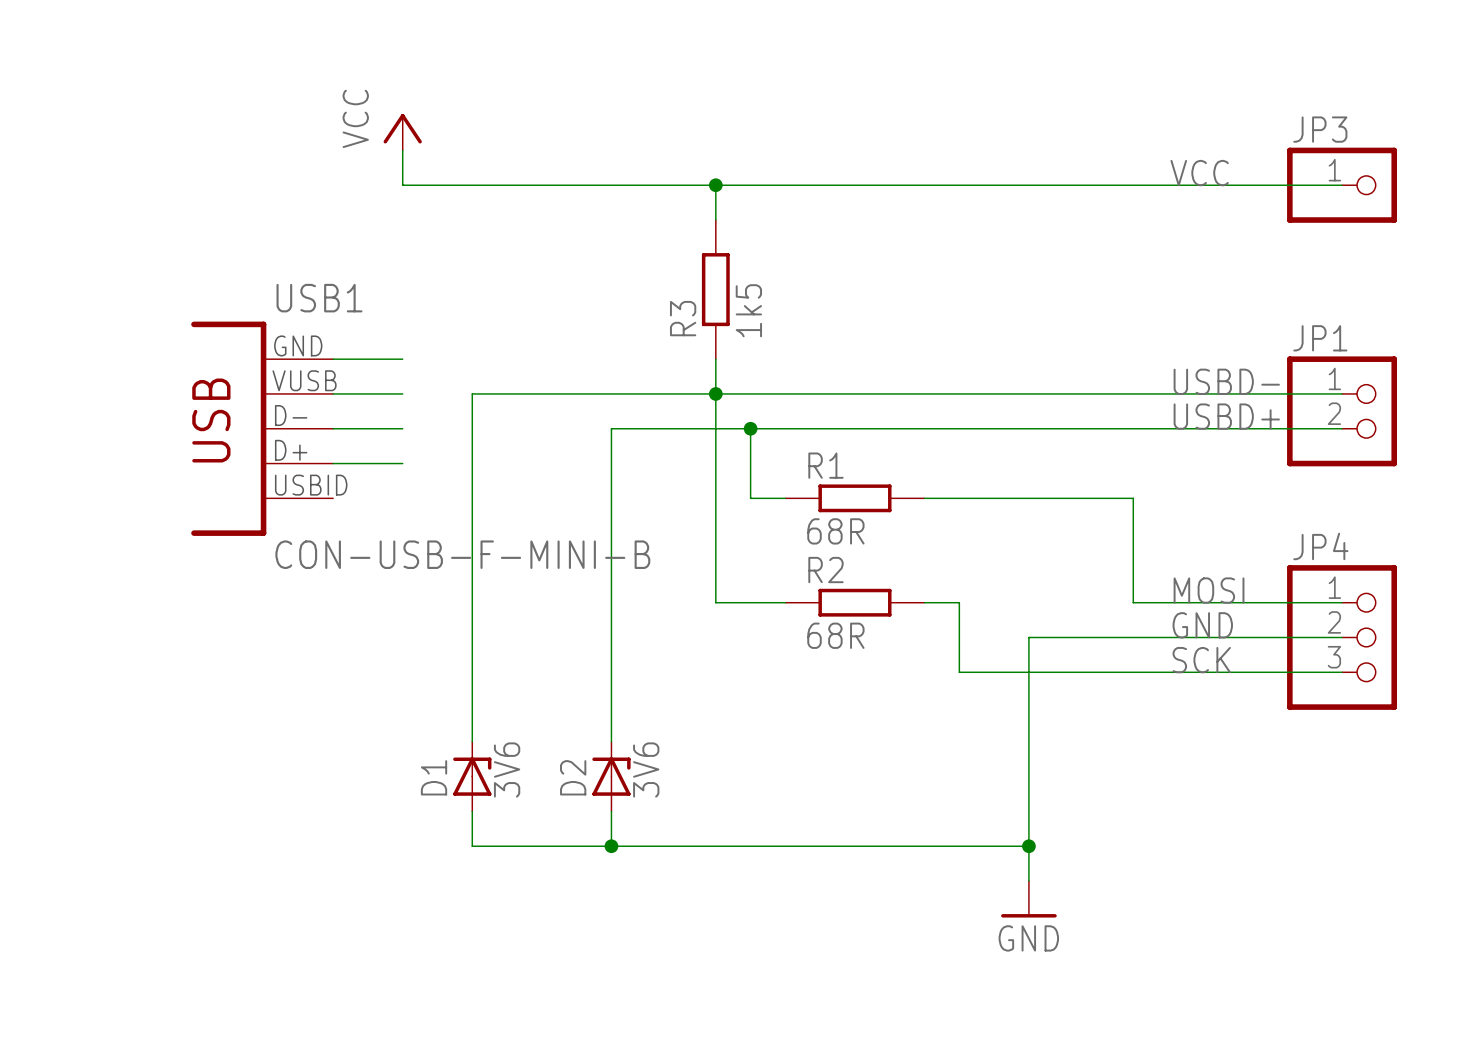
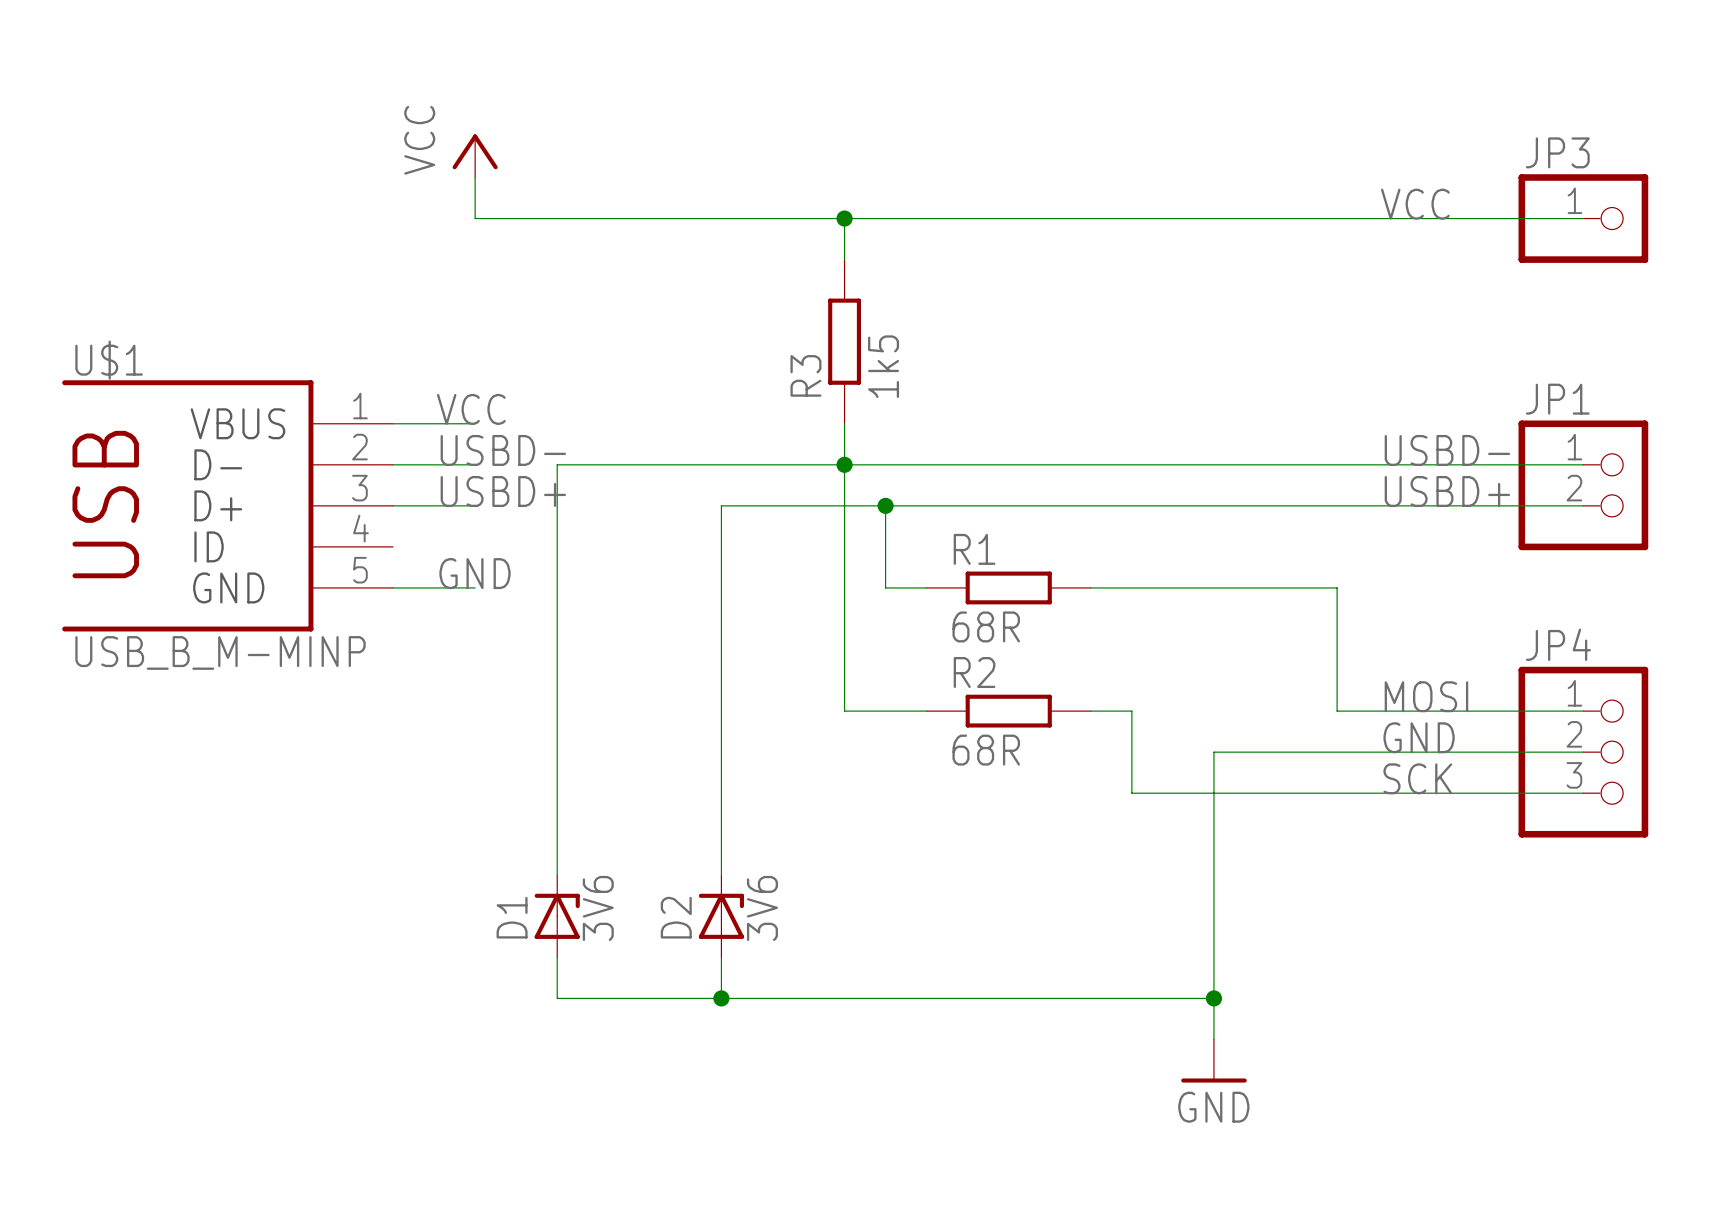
label: none -> VCC (471, 409)
label: none -> USBD- (503, 450)
label: none -> USBD+ (503, 491)
U$1: none -> USB_B_M-MINP (227, 505)
USB1: CON-USB-F-MINI-B (262, 428) -> none
wire: (333, 463) (402, 463) -> (393, 587) (475, 587)
label: none -> GND (475, 573)

